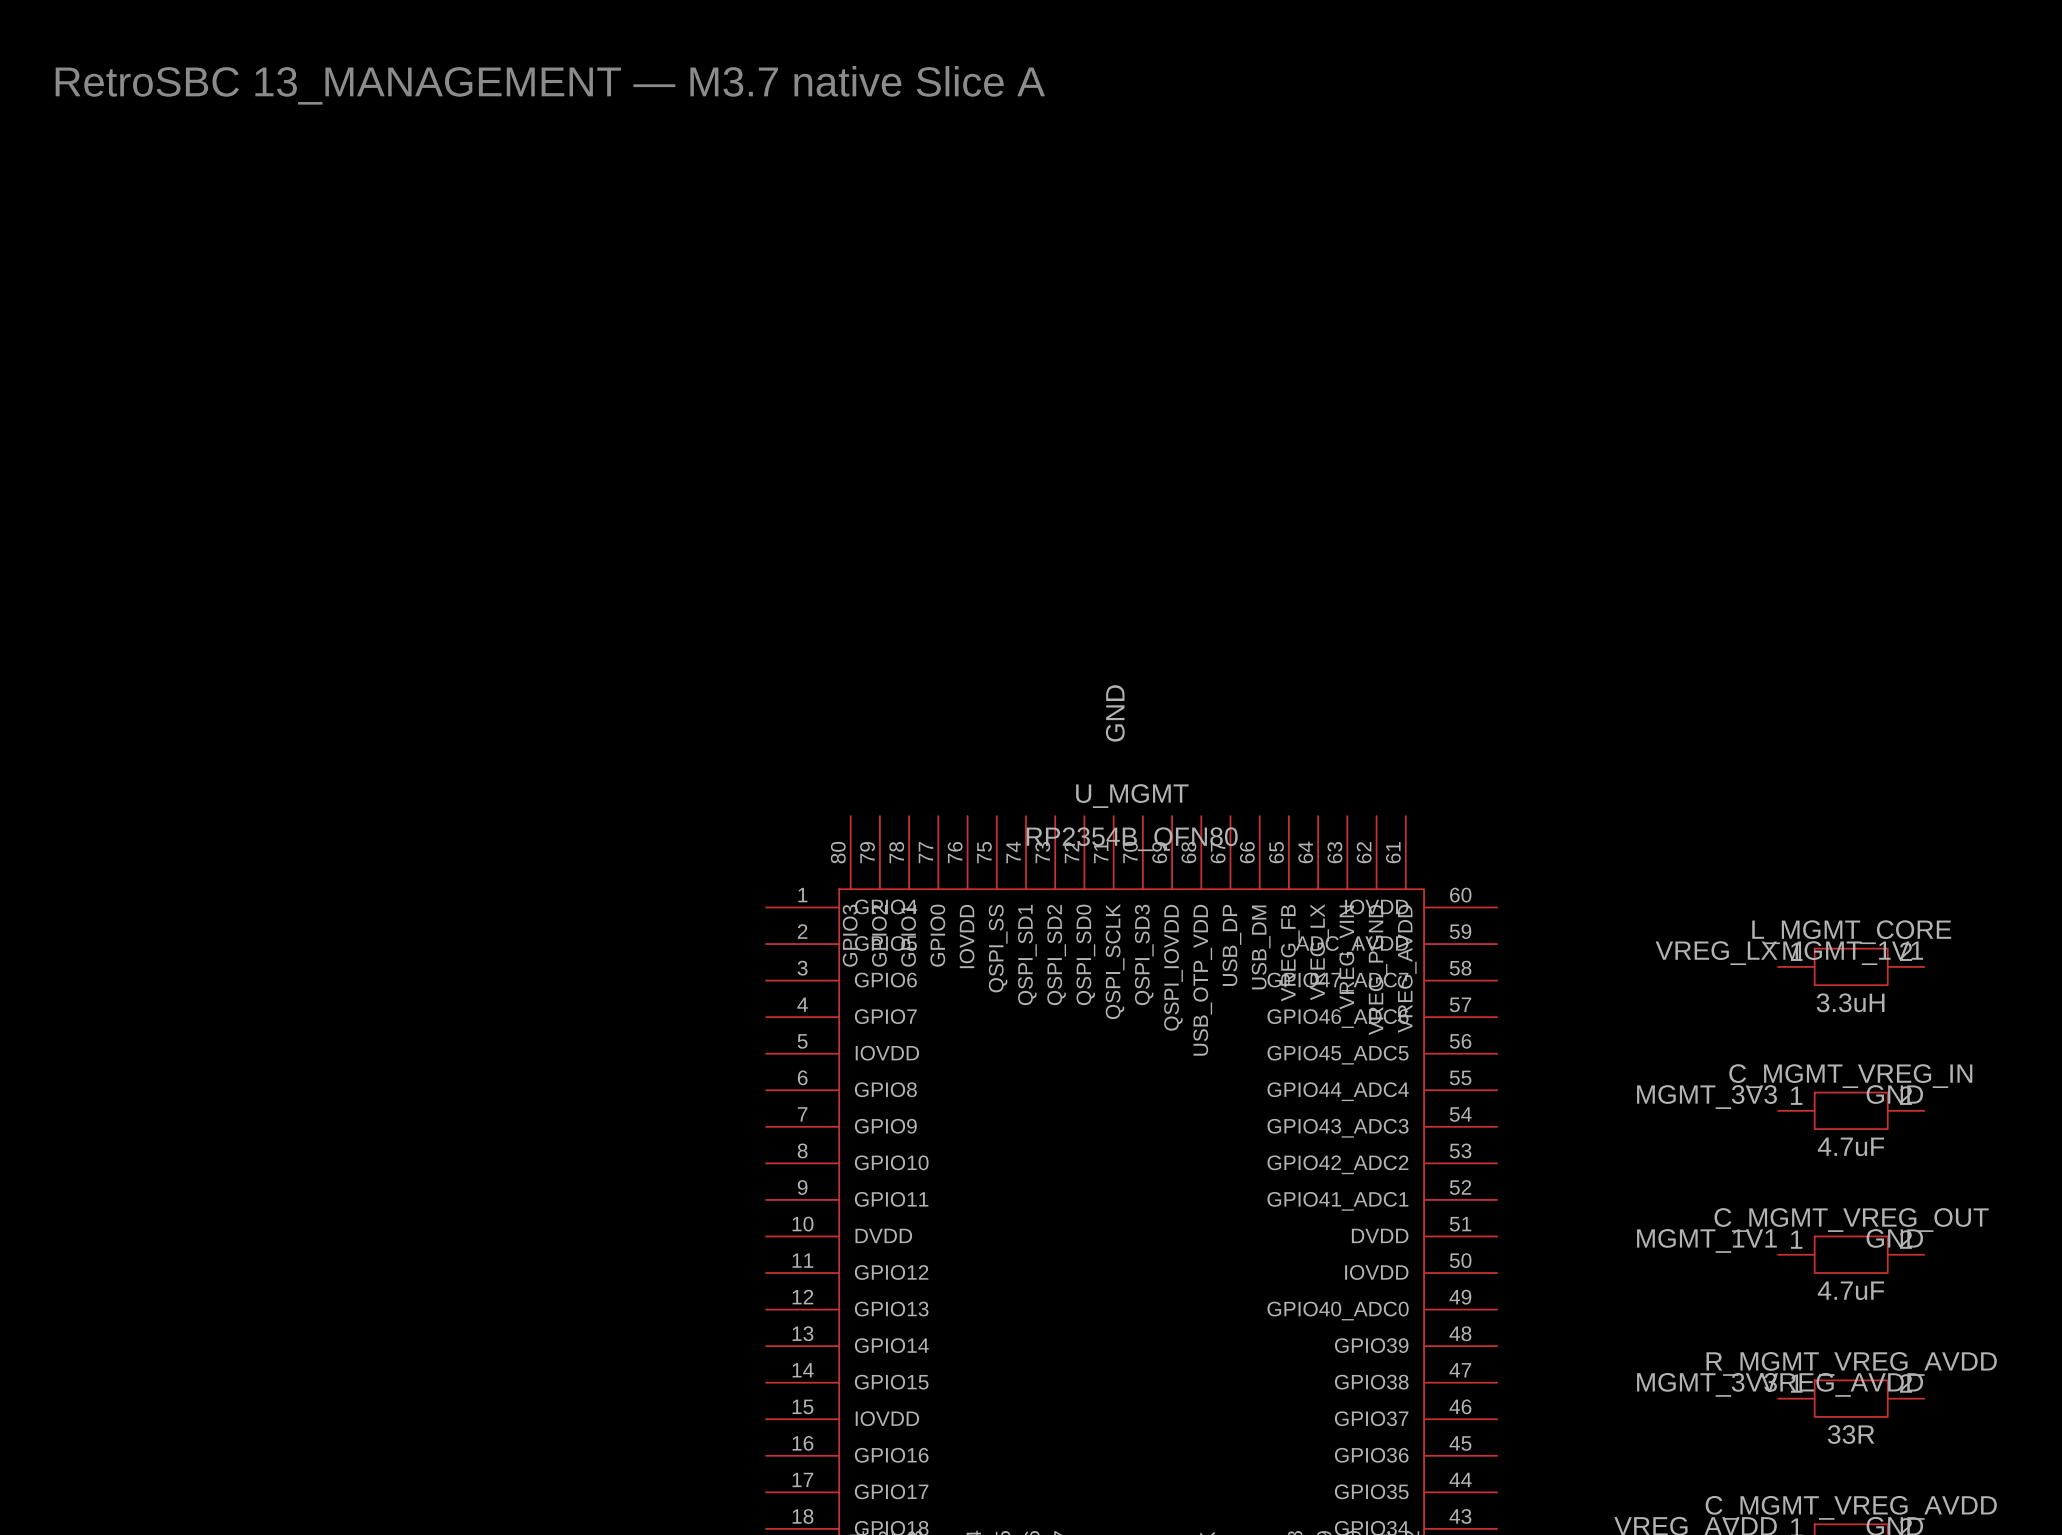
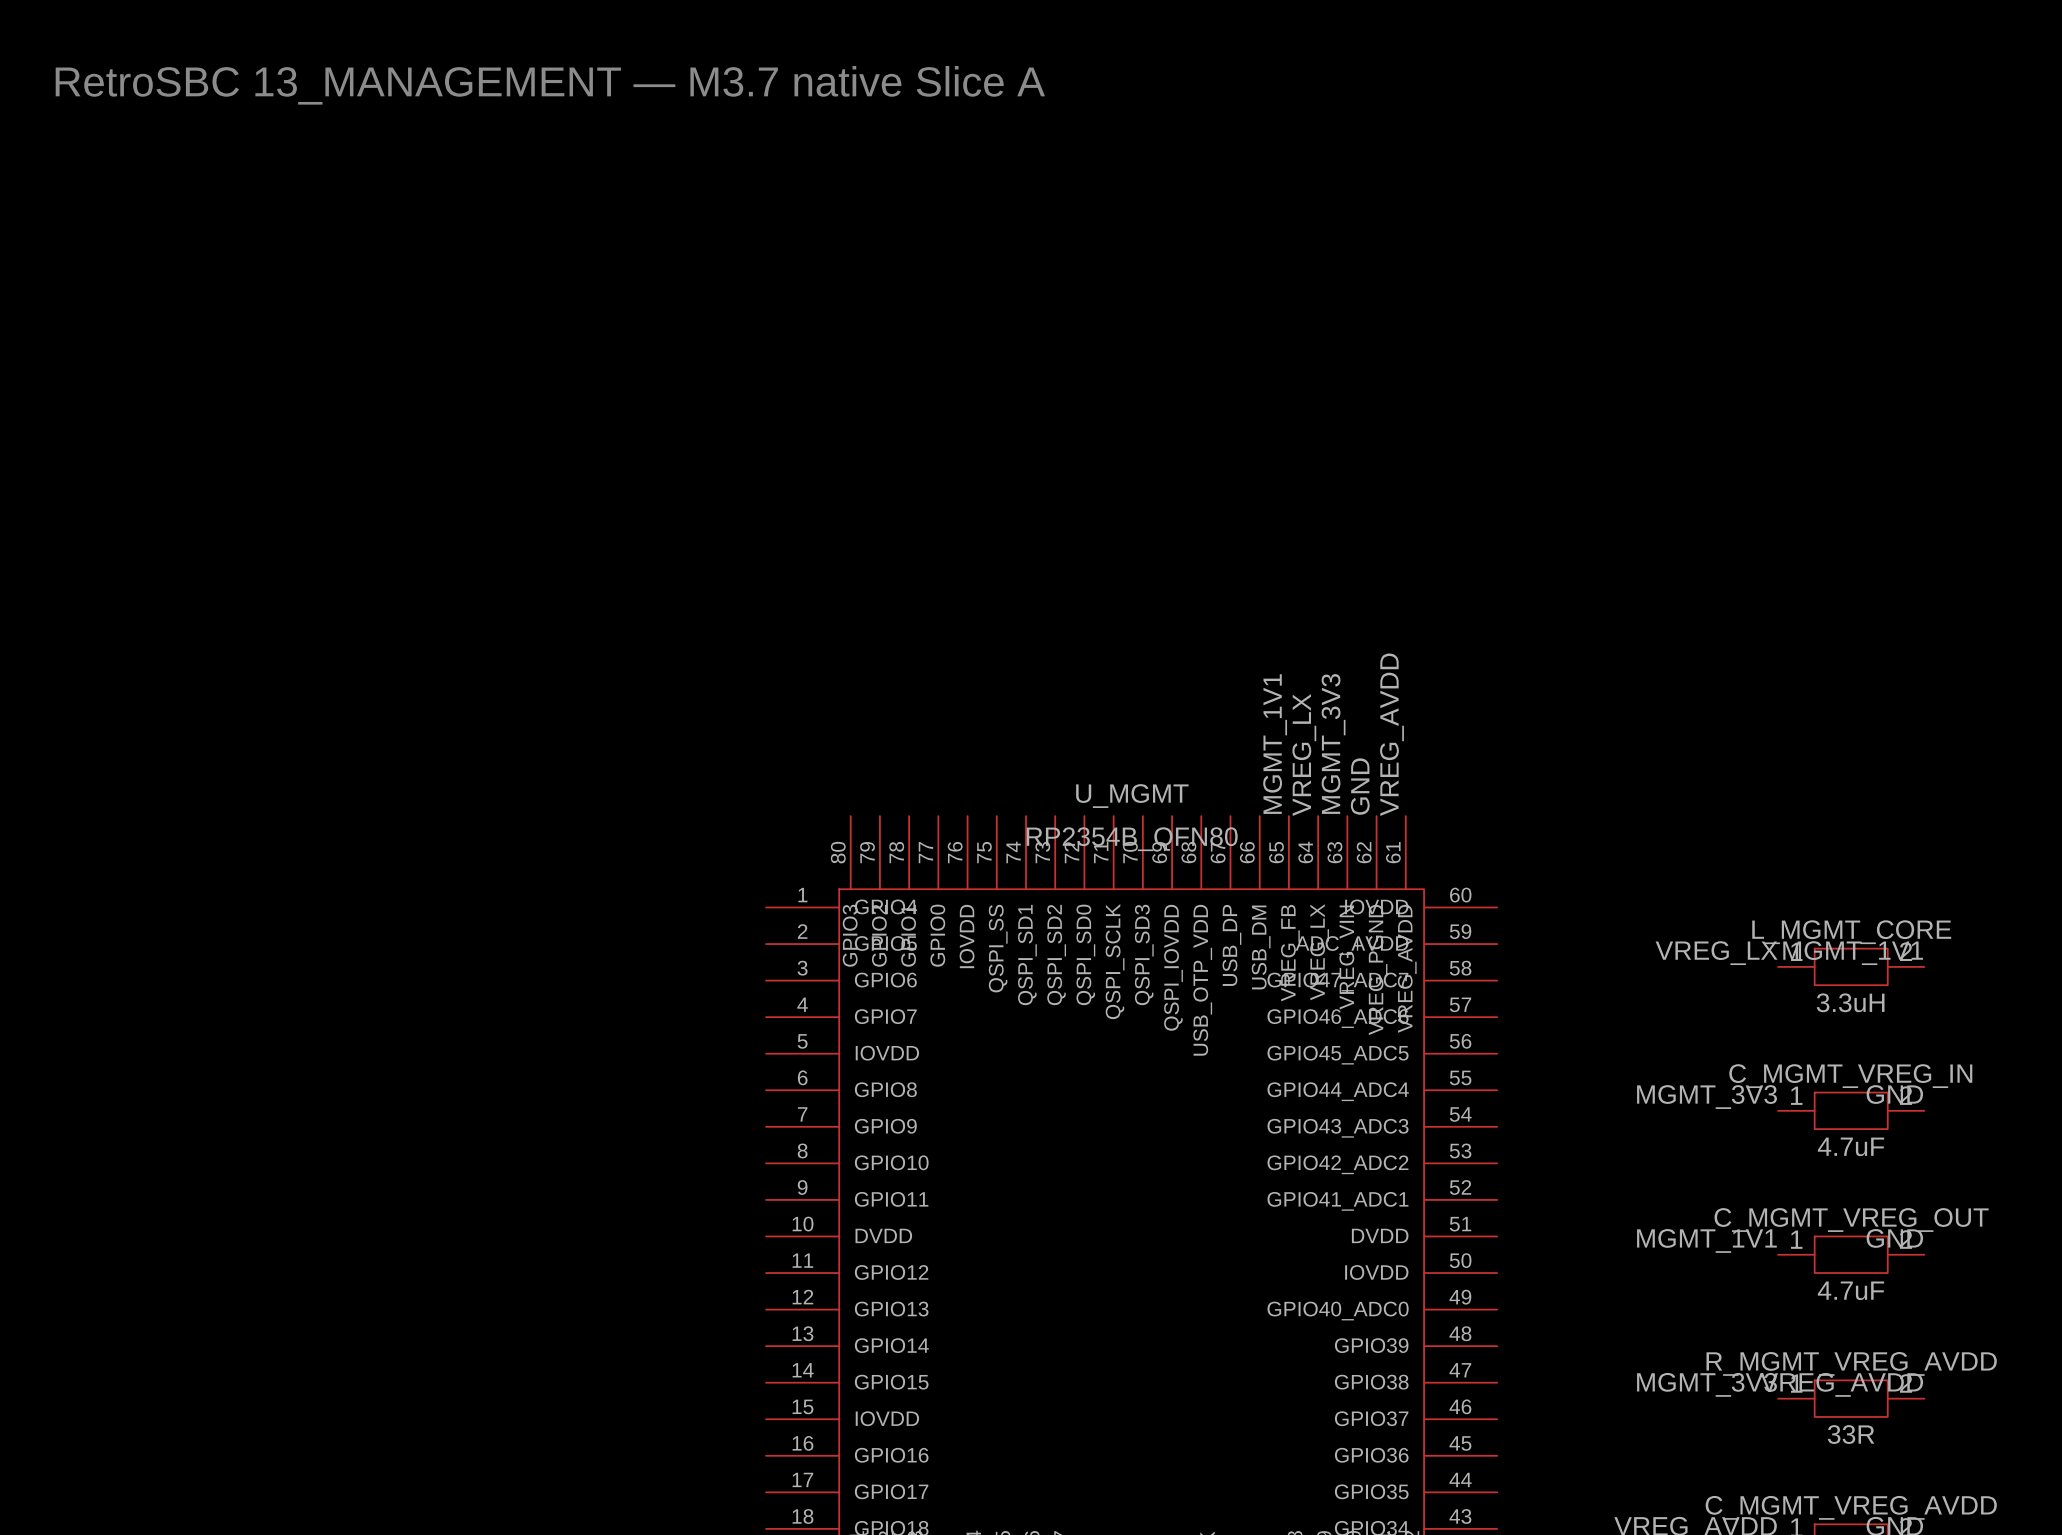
label position: GND (1115, 713) -> GND (1360, 786)
label: none -> VREG_AVDD (1391, 734)
label: none -> MGMT_1V1 (1275, 744)
label: none -> MGMT_3V3 (1333, 744)
label: none -> VREG_LX (1304, 755)

